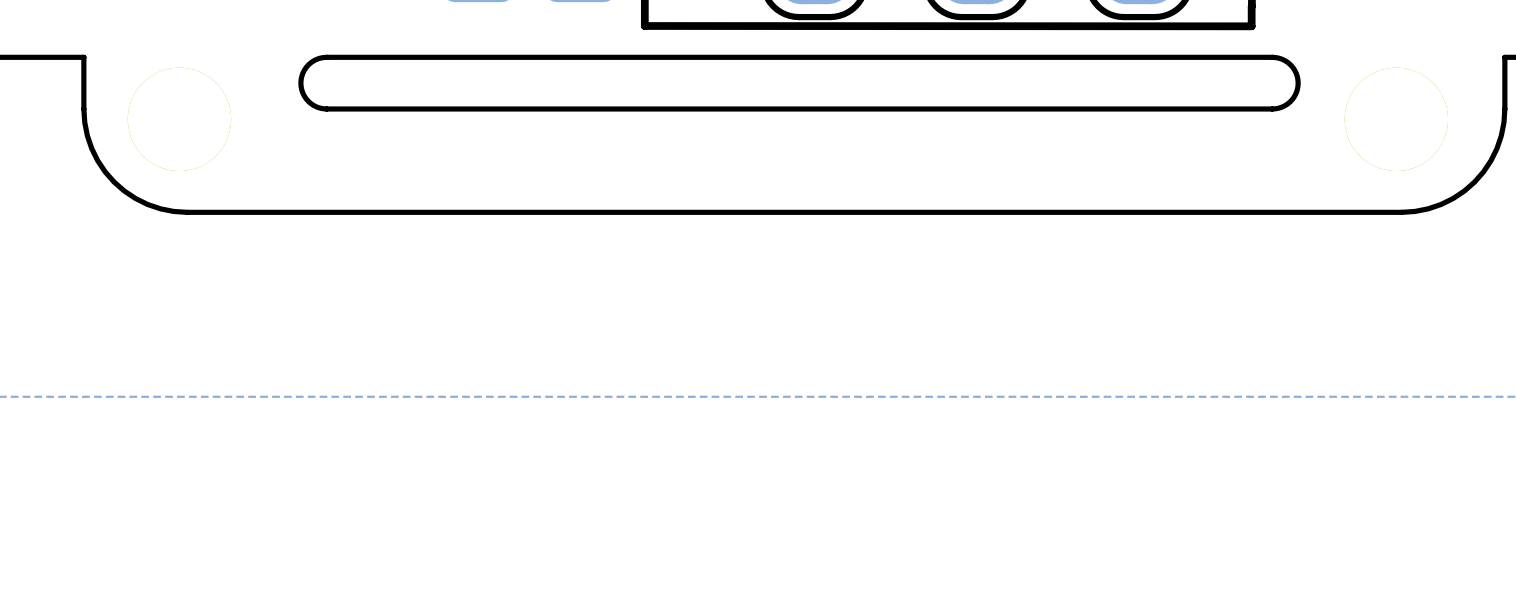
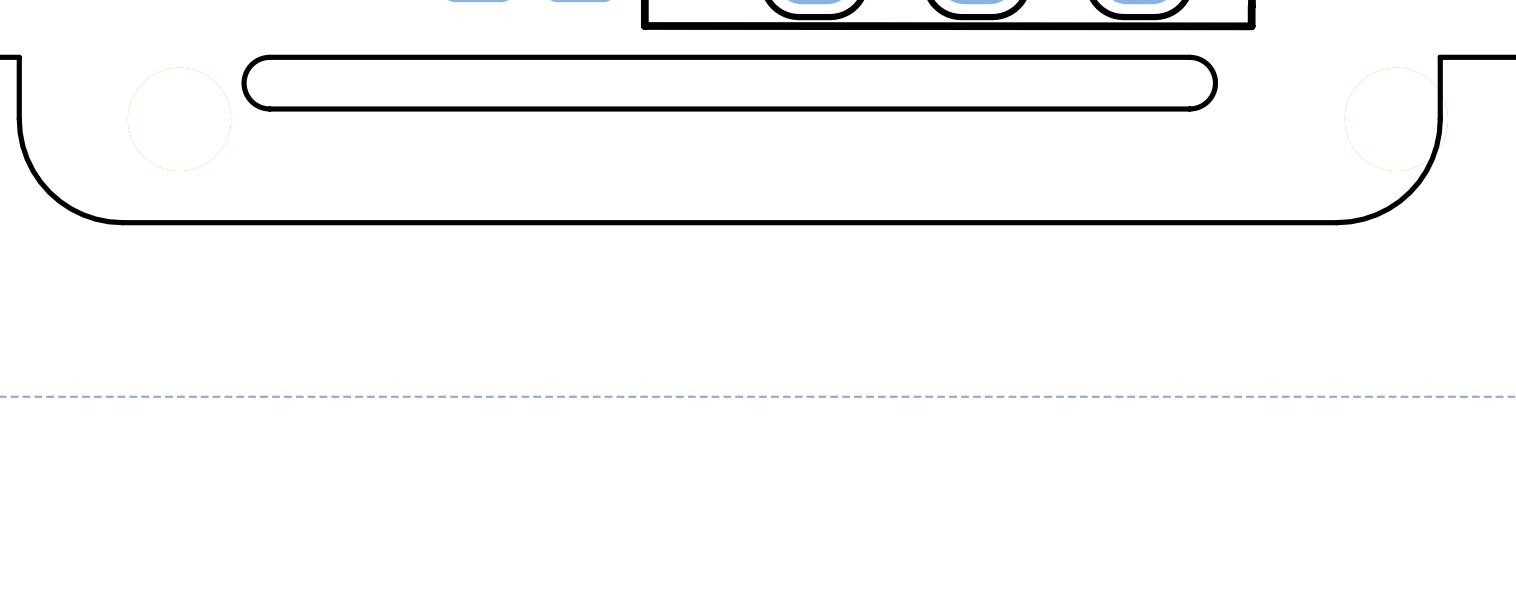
board edge: (326, 57) (316, 59) (308, 64) (302, 73) (300, 83) (302, 93) (308, 101) (316, 107) (326, 109) -> (326, 57) (260, 59) (248, 68) (244, 83) (248, 97) (260, 107) (326, 109)
board edge: (1189, 57) (1279, 58) (1292, 67) (1298, 83) (1292, 98) (1279, 108) (1189, 109) -> (1189, 57) (1201, 60) (1208, 66) (1213, 74) (1215, 83) (1213, 92) (1208, 100) (1201, 106) (1189, 109)
board edge: (1504, 57) (1503, 122) (1496, 148) (1491, 160) (1474, 182) (1453, 198) (1428, 208) (1401, 212) (173, 211) (160, 208) (135, 198) (114, 182) (97, 160) (91, 148) (84, 122) (83, 57) (19, 57) -> (1504, 57) (1440, 57) (1439, 132) (1436, 146) (1426, 171) (1410, 192) (1388, 208) (1363, 219) (1336, 222) (109, 221) (83, 214) (59, 201) (40, 182) (33, 171) (27, 158) (20, 132) (19, 57)

